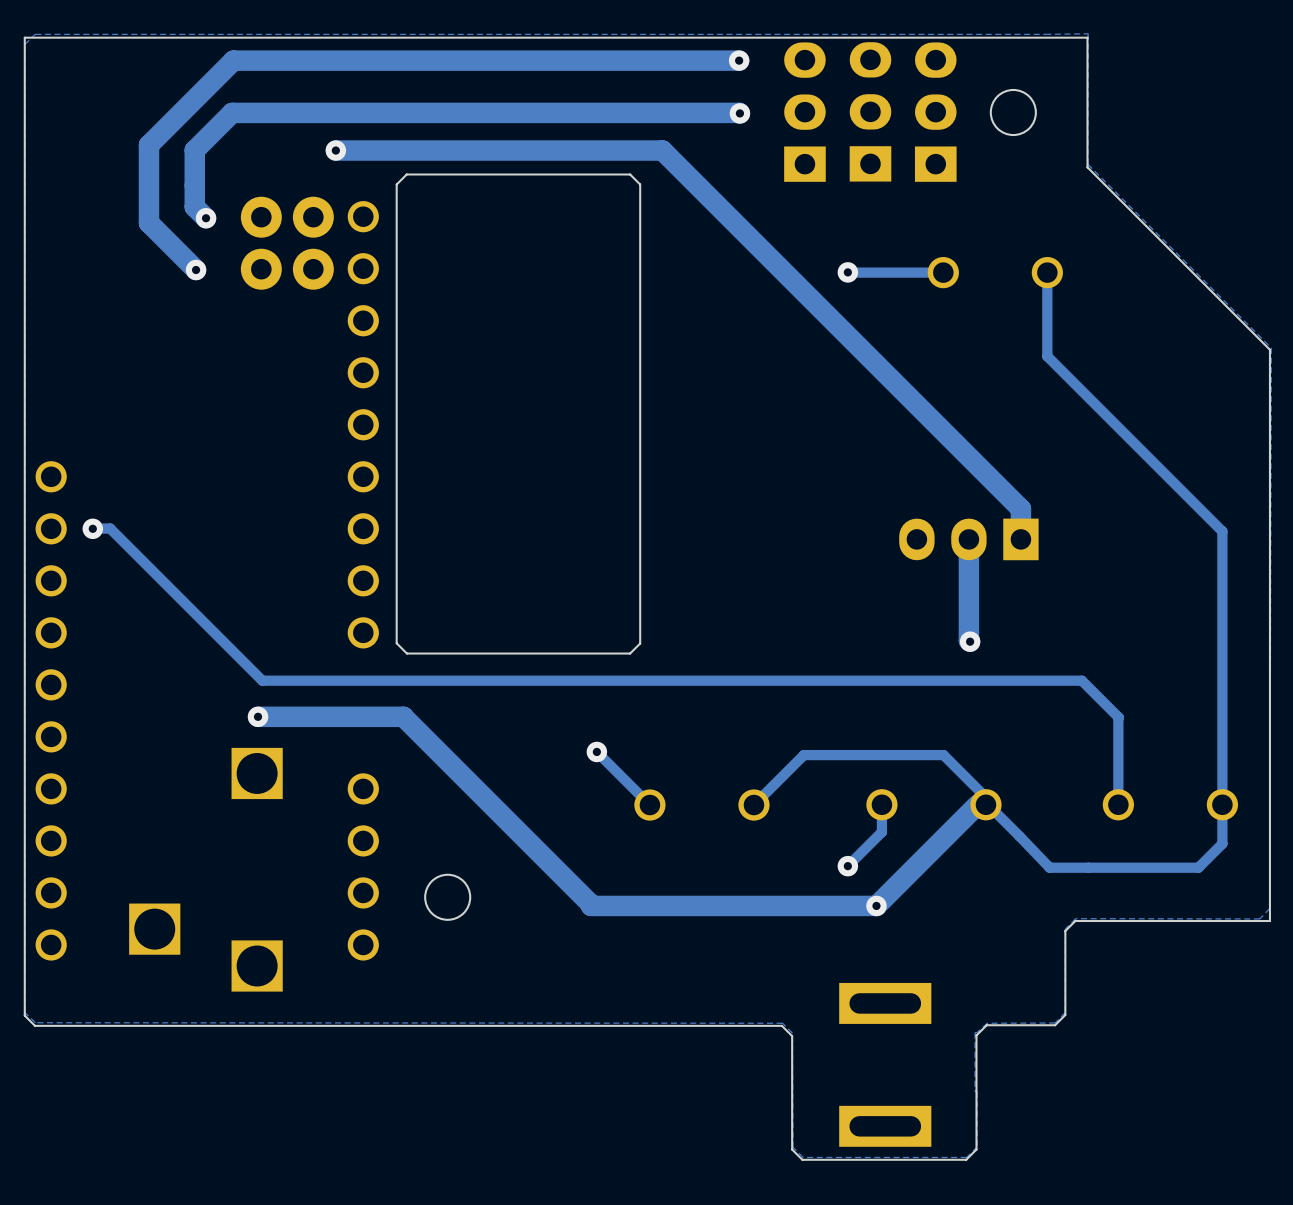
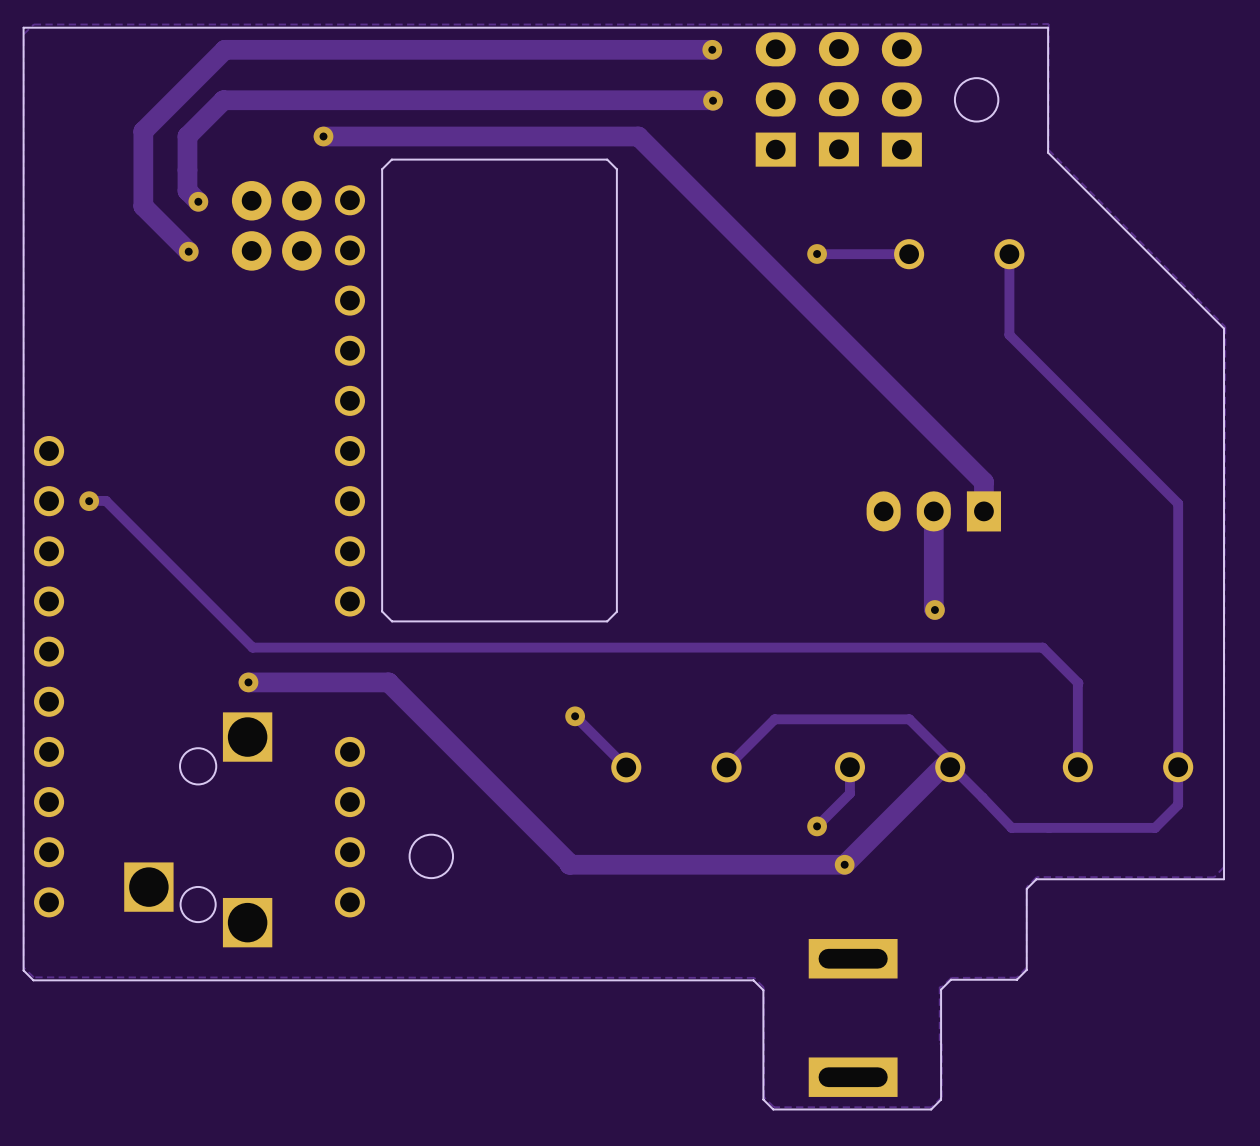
round board edge: none -> [179, 747, 218, 786]
round board edge: none -> [179, 885, 217, 924]

